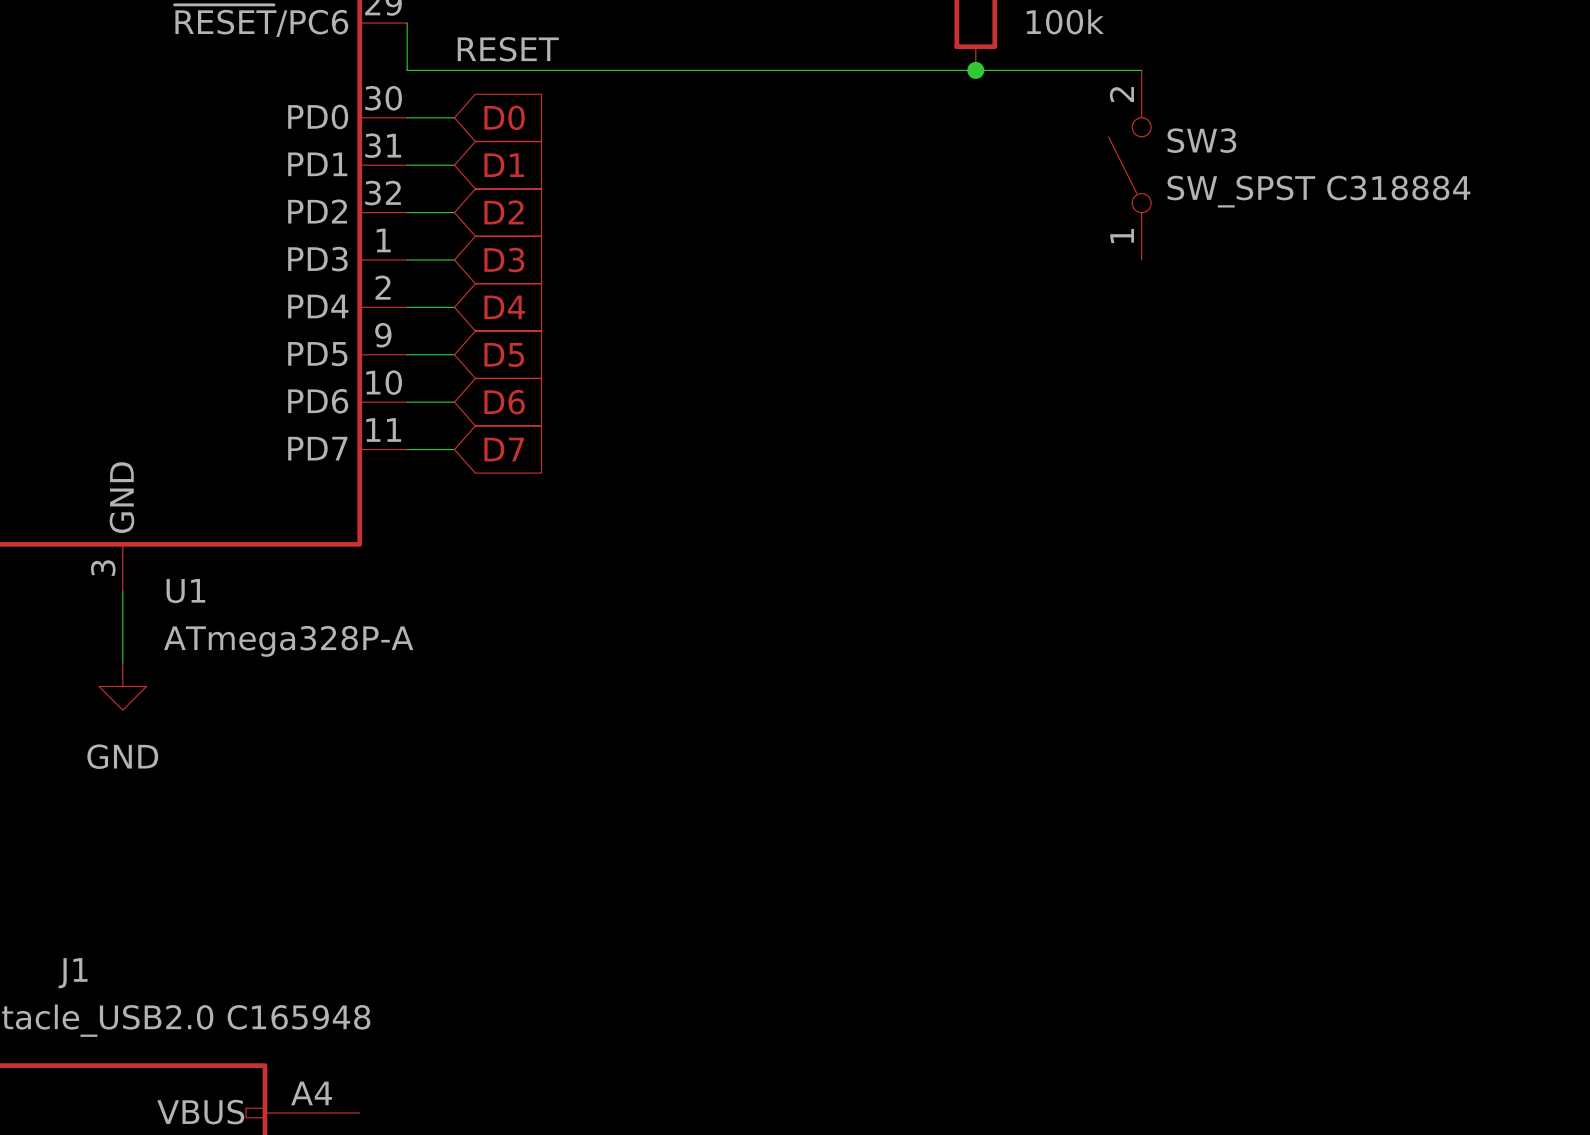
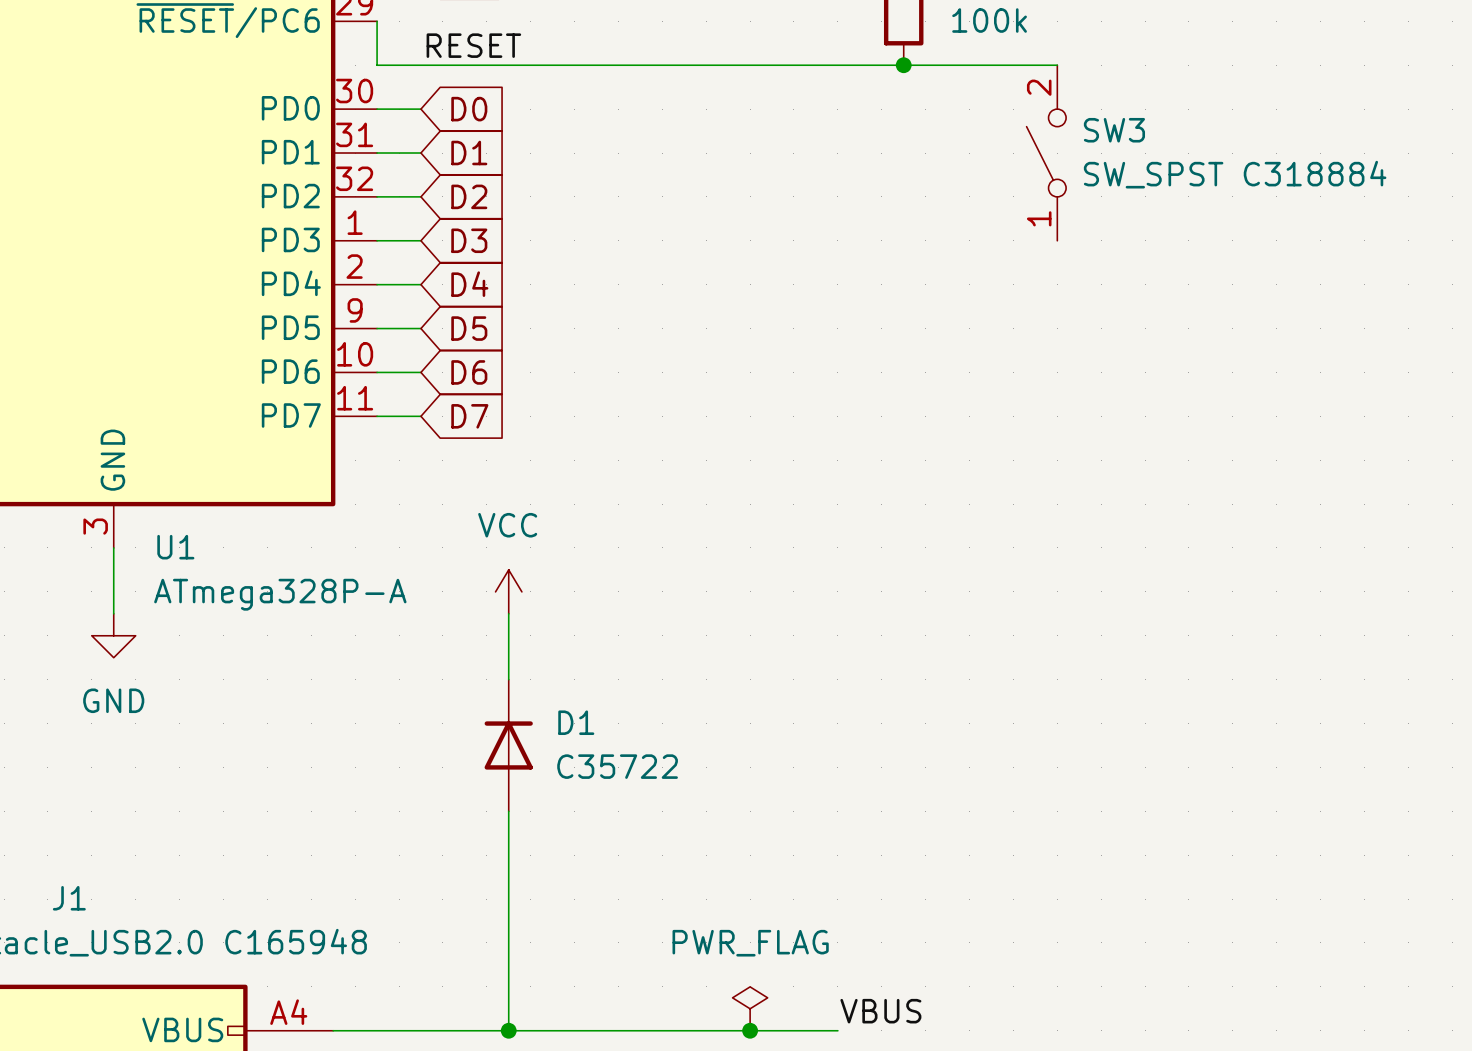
power symbol: none -> VCC (508, 591)
wire: none -> (508, 613) (508, 679)
D1: none -> C35722 (508, 745)
wire: none -> (508, 811) (508, 1030)
power symbol: none -> PWR_FLAG (750, 1008)
label: none -> VBUS (880, 1011)
wire: none -> (333, 1030) (837, 1030)
junction: none -> (508, 1030)
junction: none -> (750, 1030)

